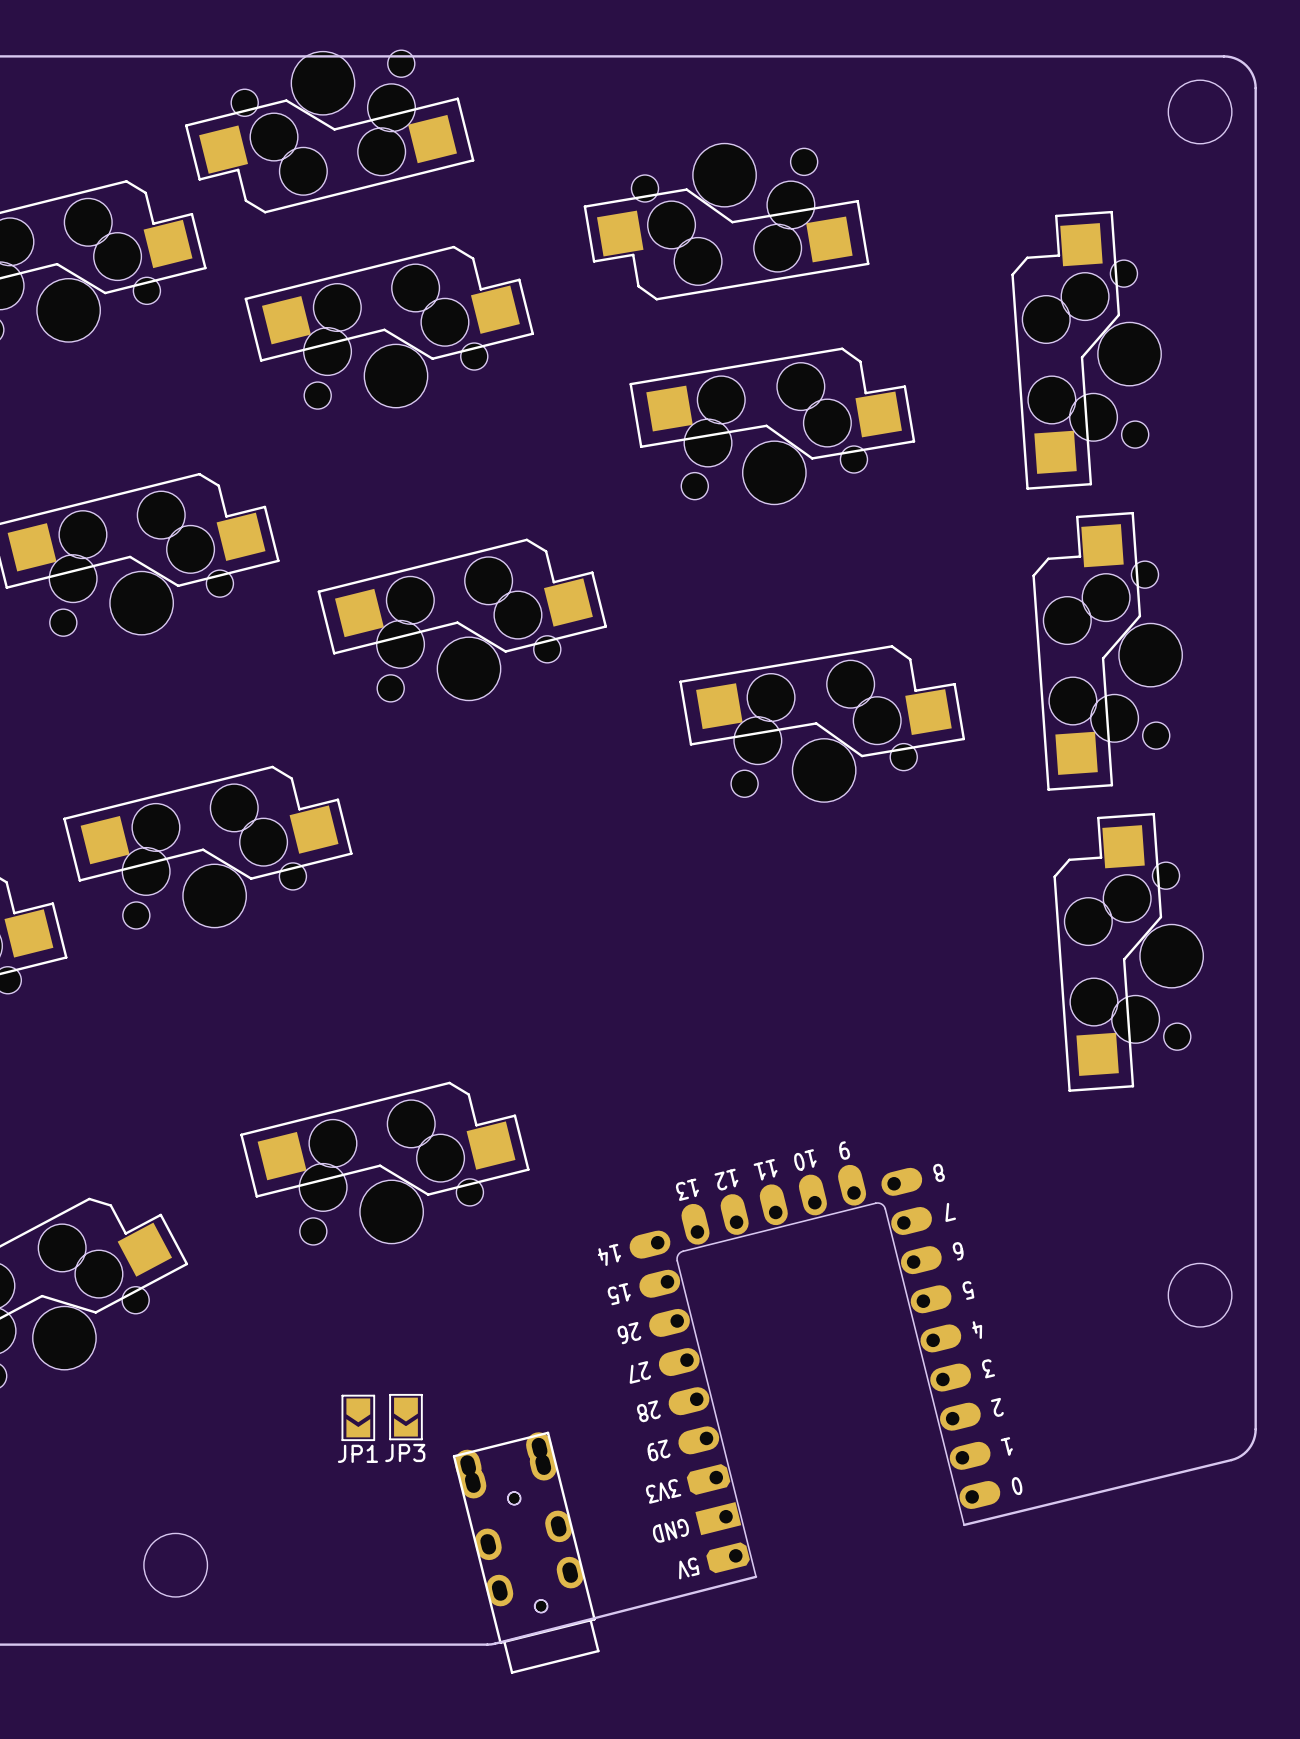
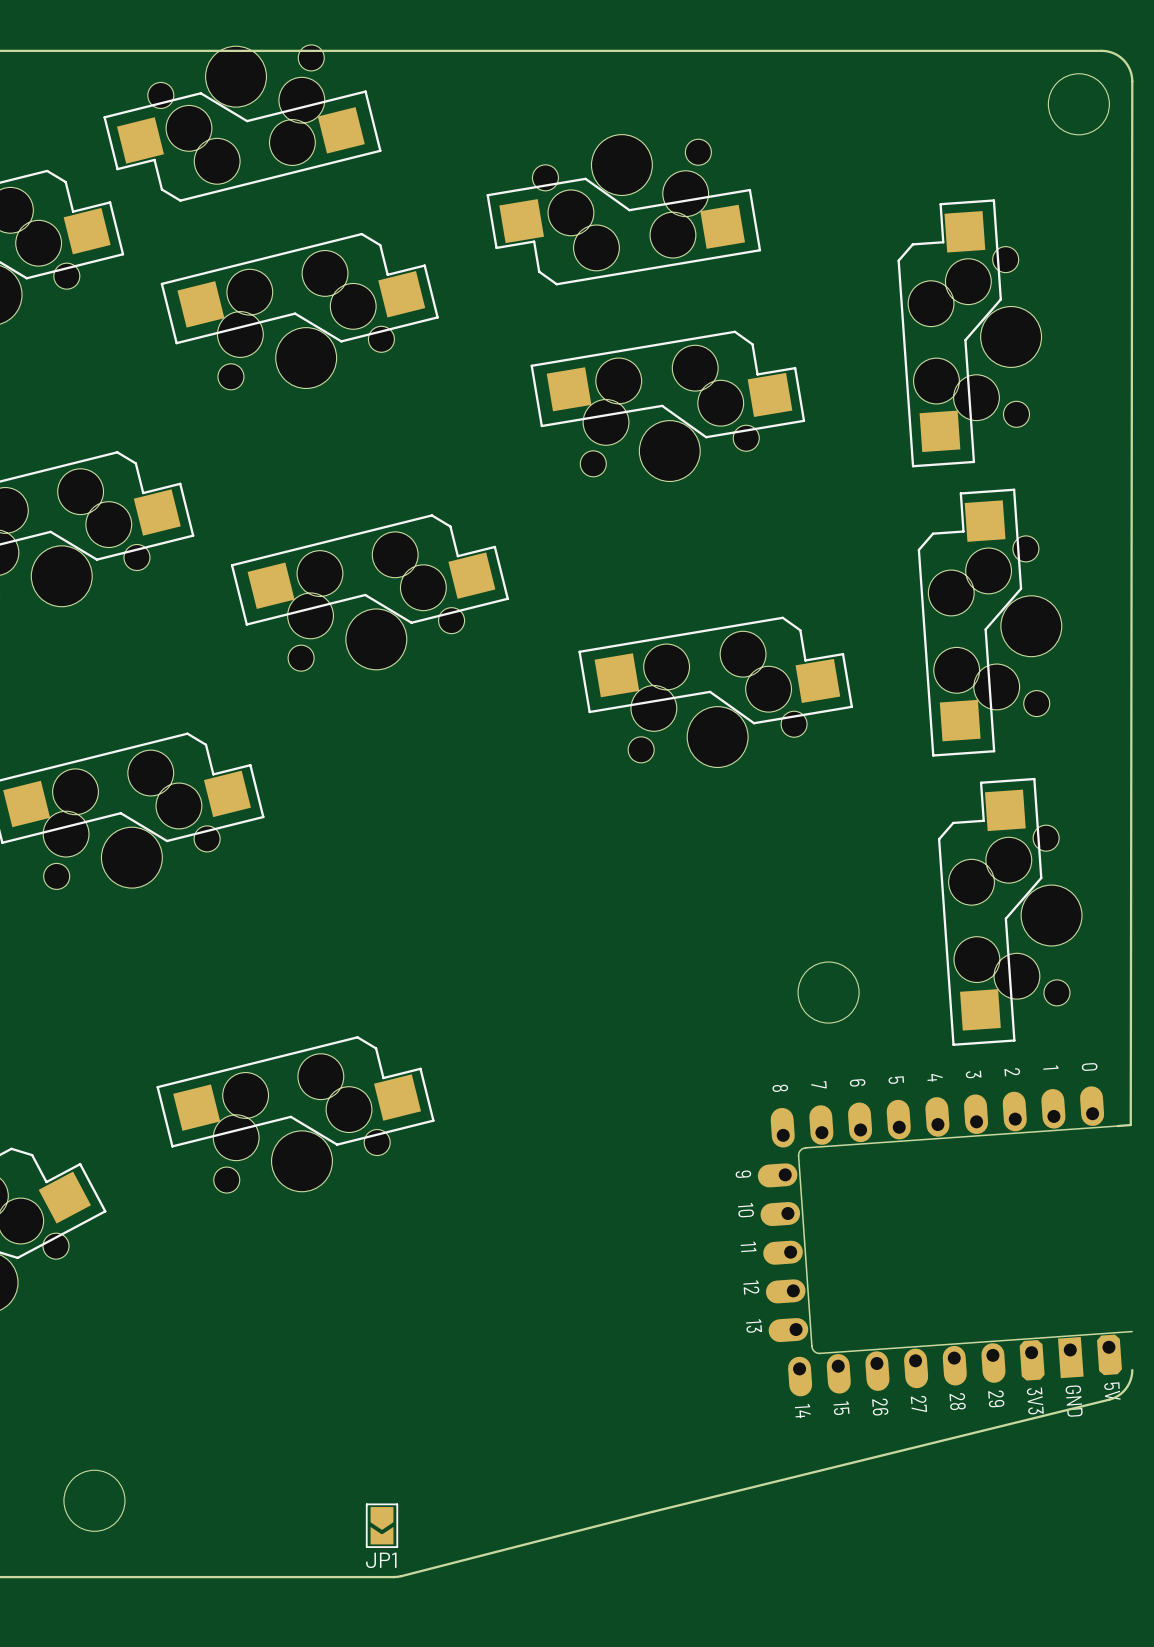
board edge: (1255, 88) (1255, 1429) -> (1132, 81) (1130, 1125) (1117, 1126)
part: none -> (945, 1241)
drawing position: (1200, 1295) -> (828, 992)
part: (814, 1371) -> none
JP1 position: (358, 1417) -> (382, 1525)
JP3: (405, 1417) -> none
board edge: (1231, 1460) (964, 1524) -> (1109, 1399) (652, 1511)
part: (519, 1530) -> none
part: (526, 1552) -> none

